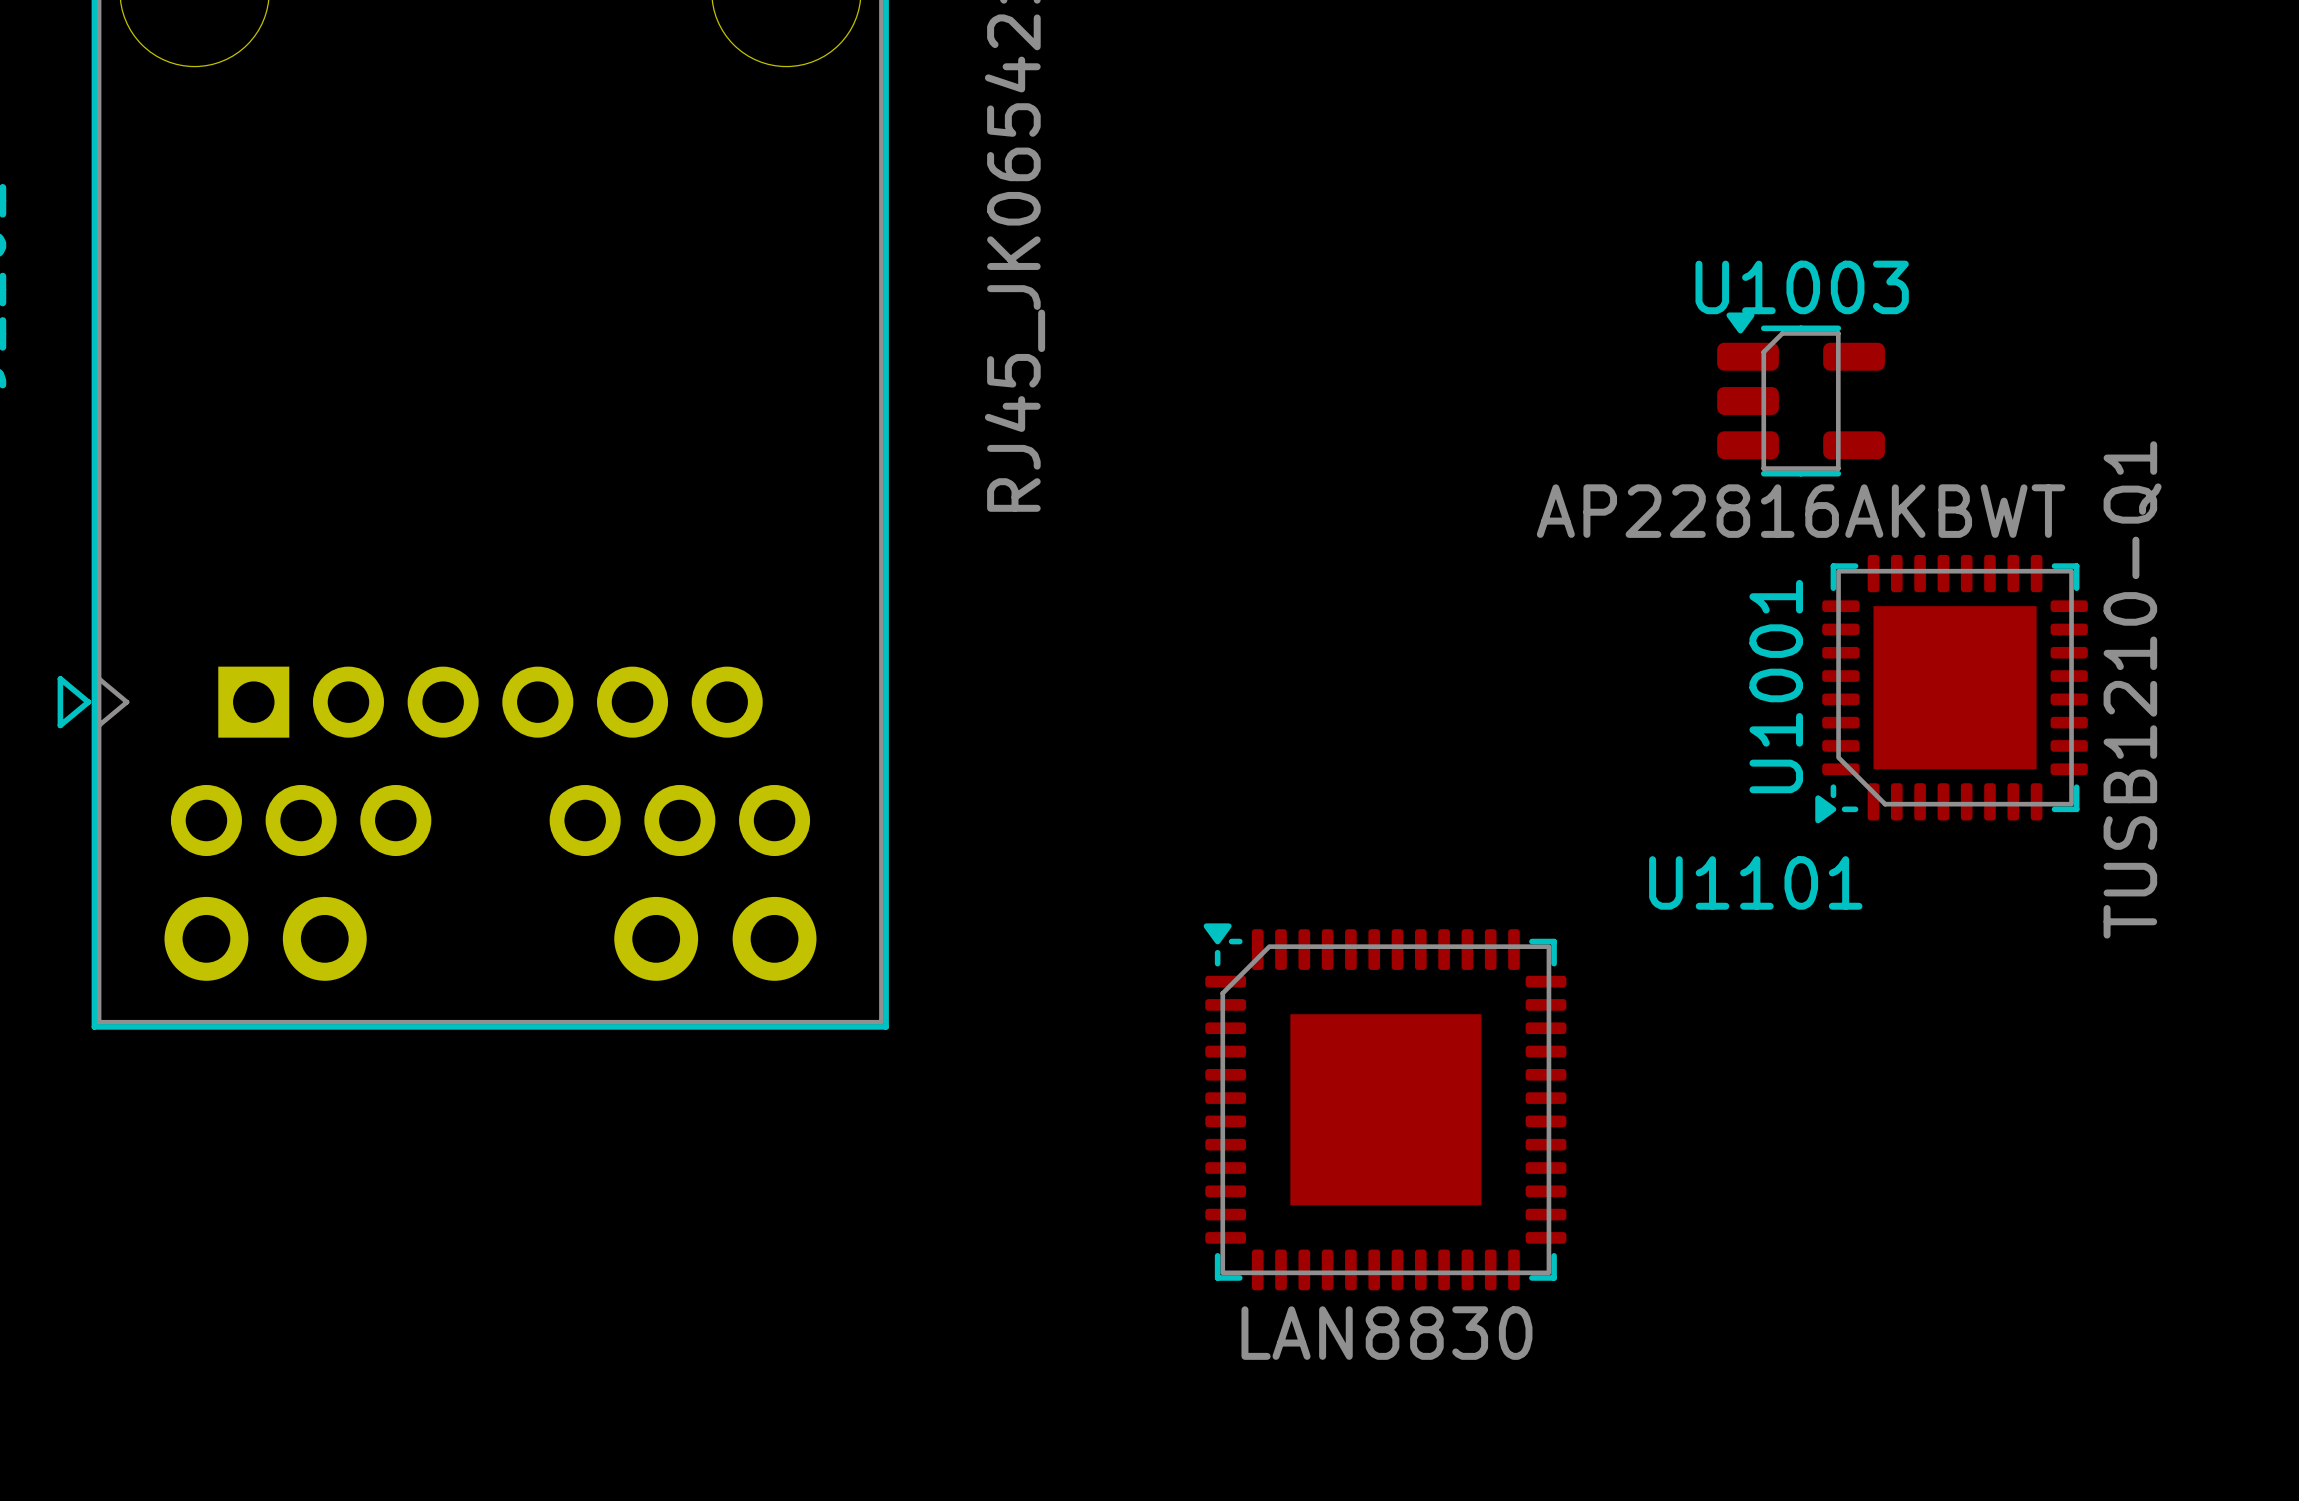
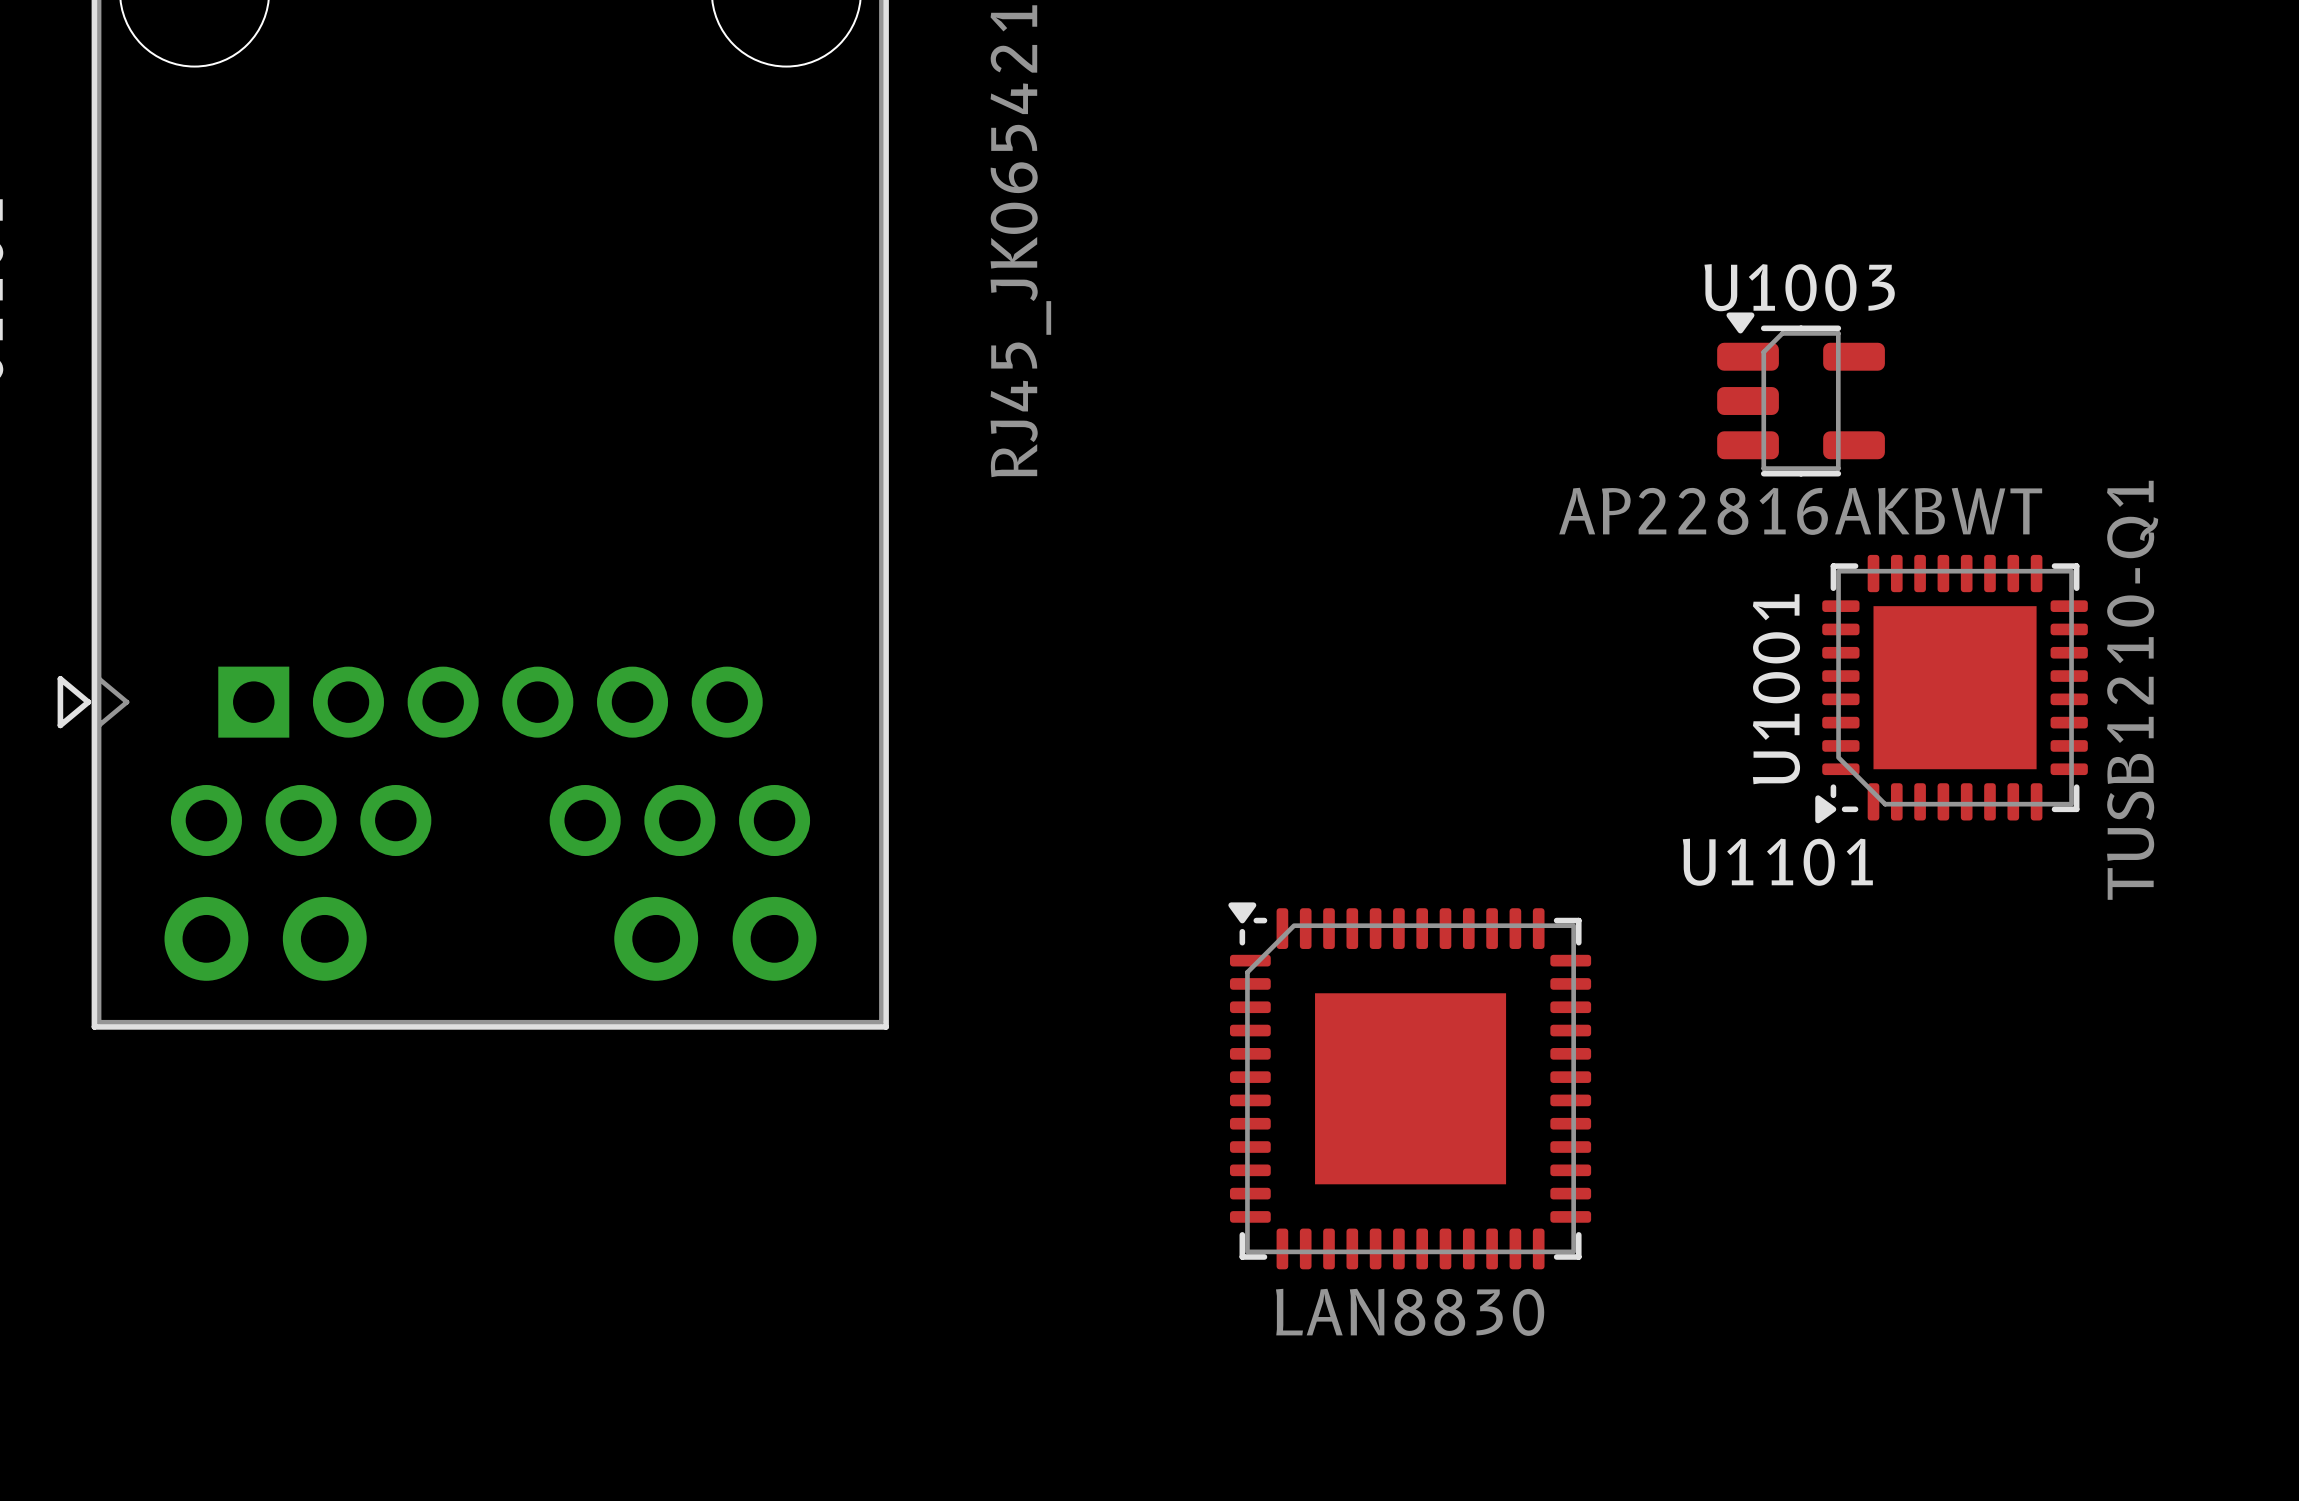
U1101 position: (1385, 1106) -> (1409, 1085)

